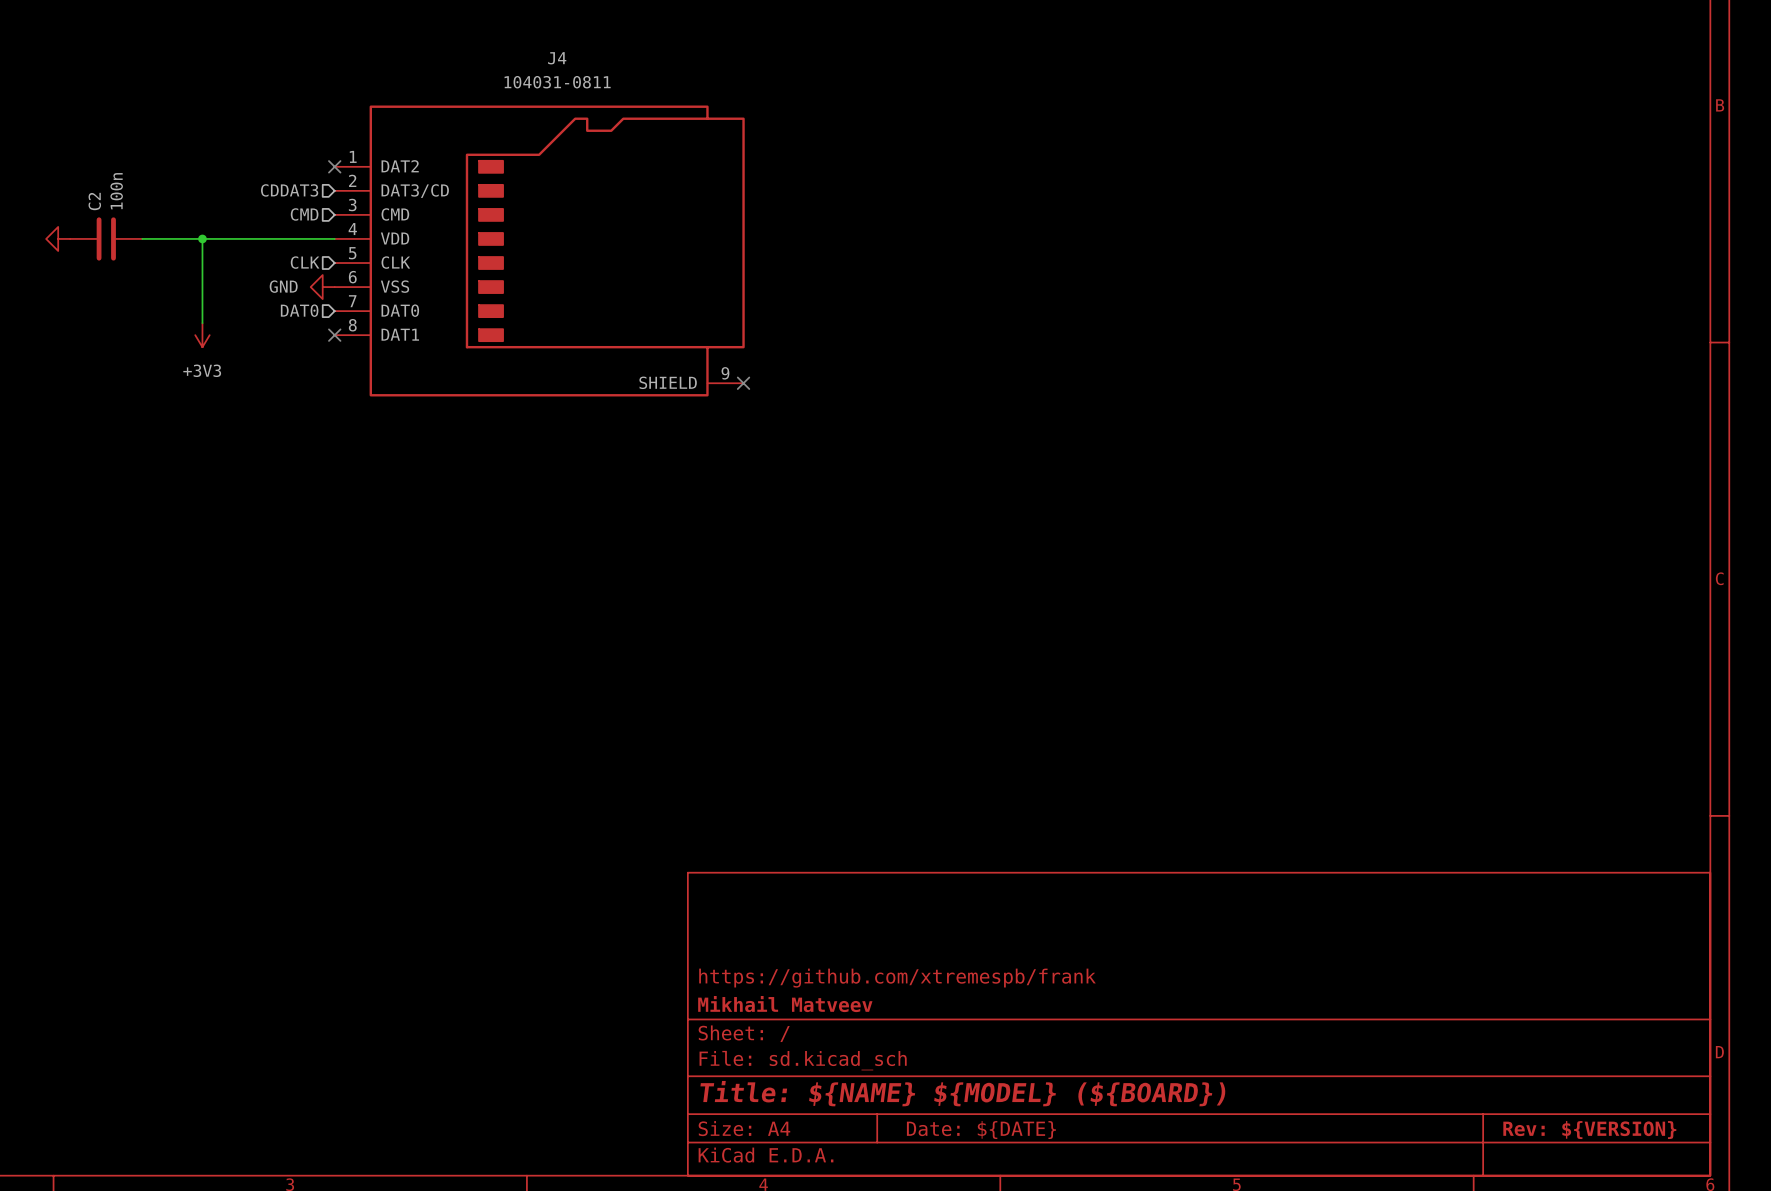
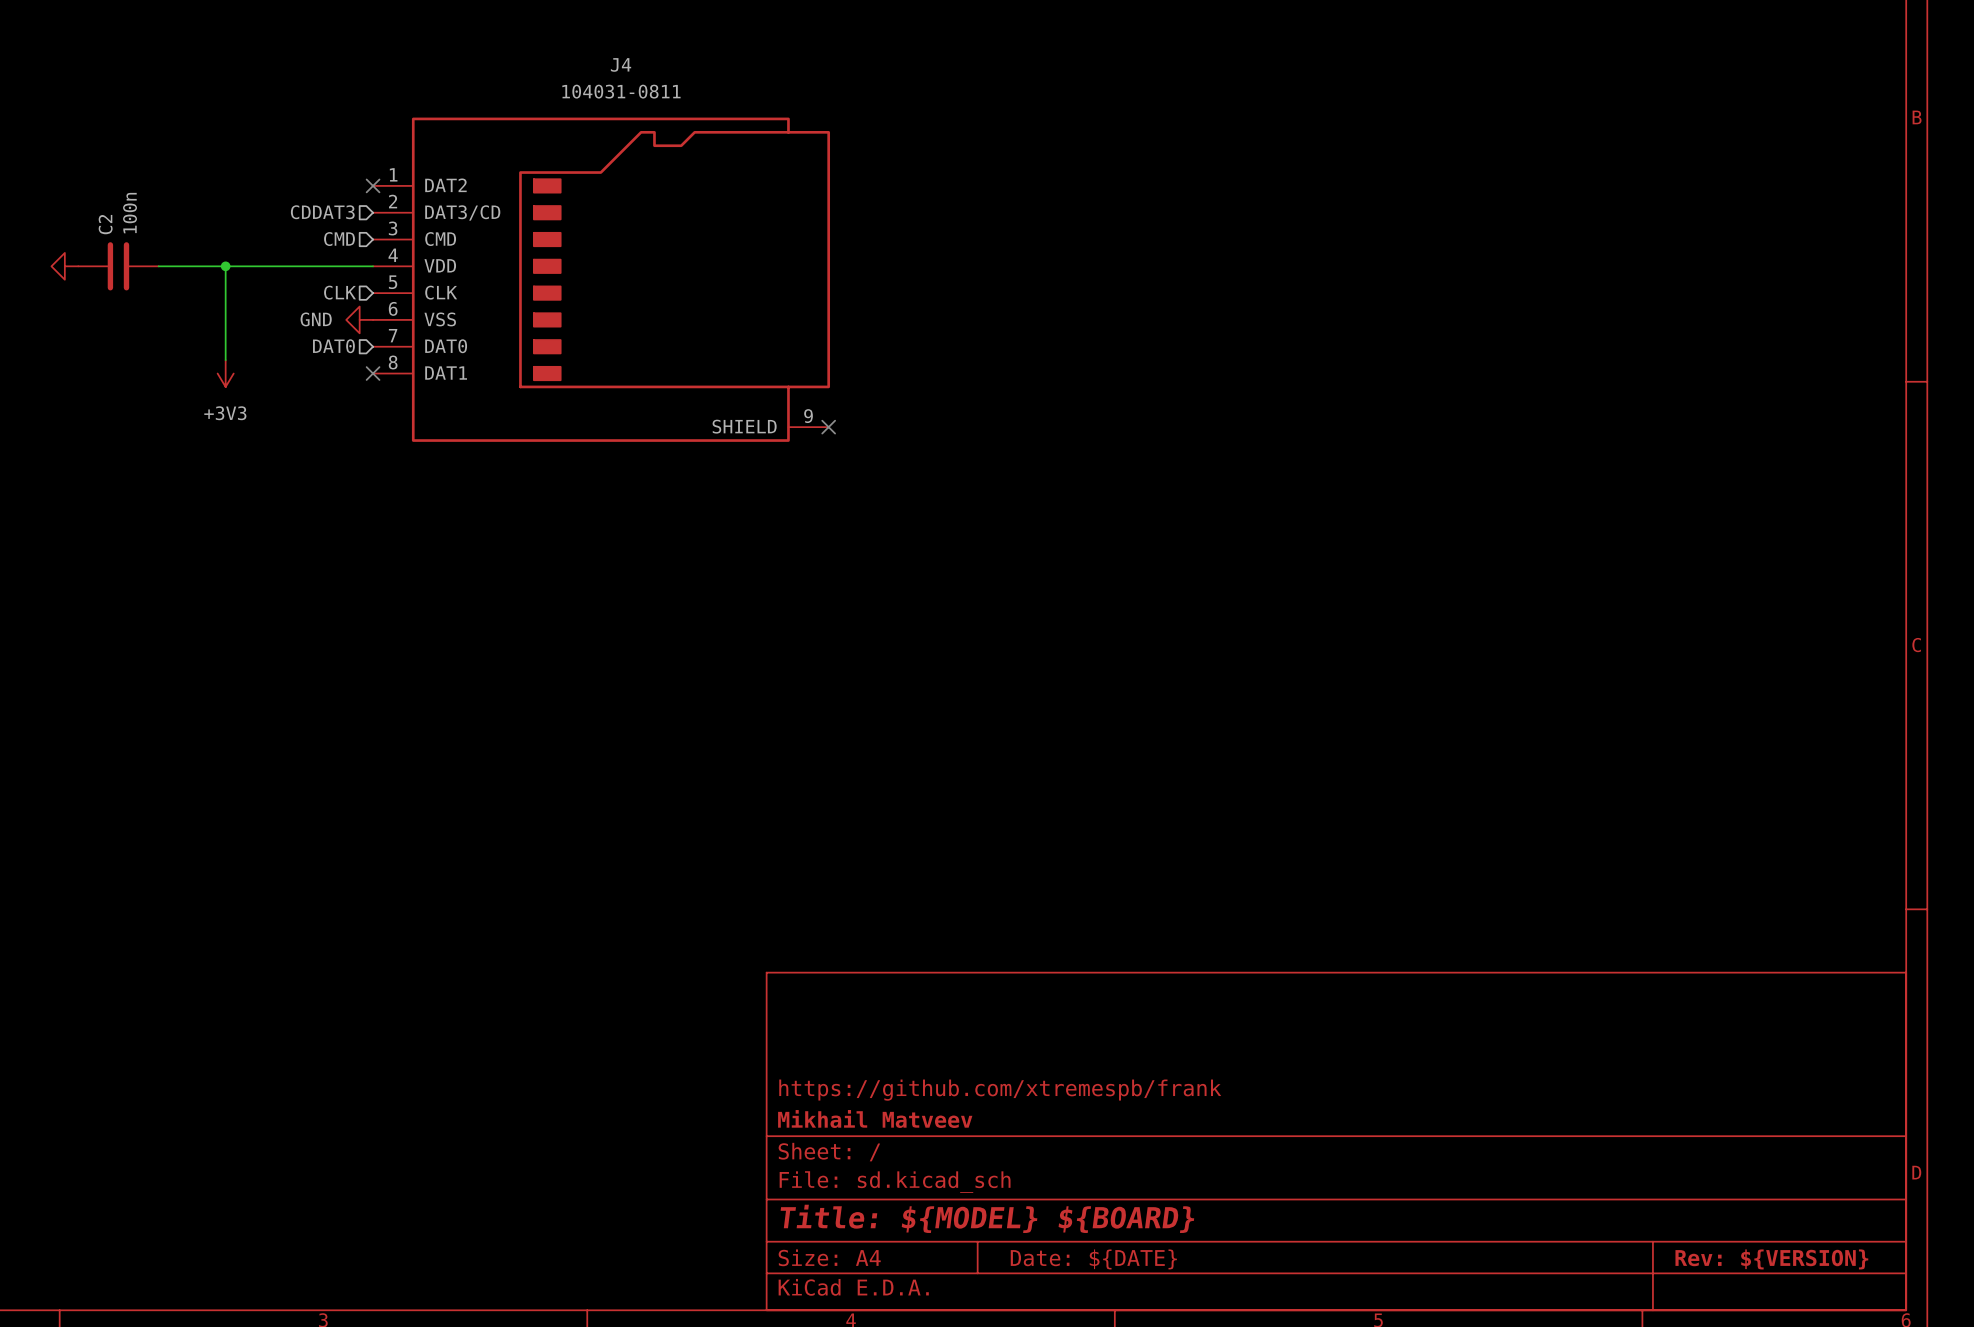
title block: Title: ${NAME} ${MODEL} (${BOARD}) (962, 1093) -> Title: ${MODEL} ${BOARD} (987, 1218)

